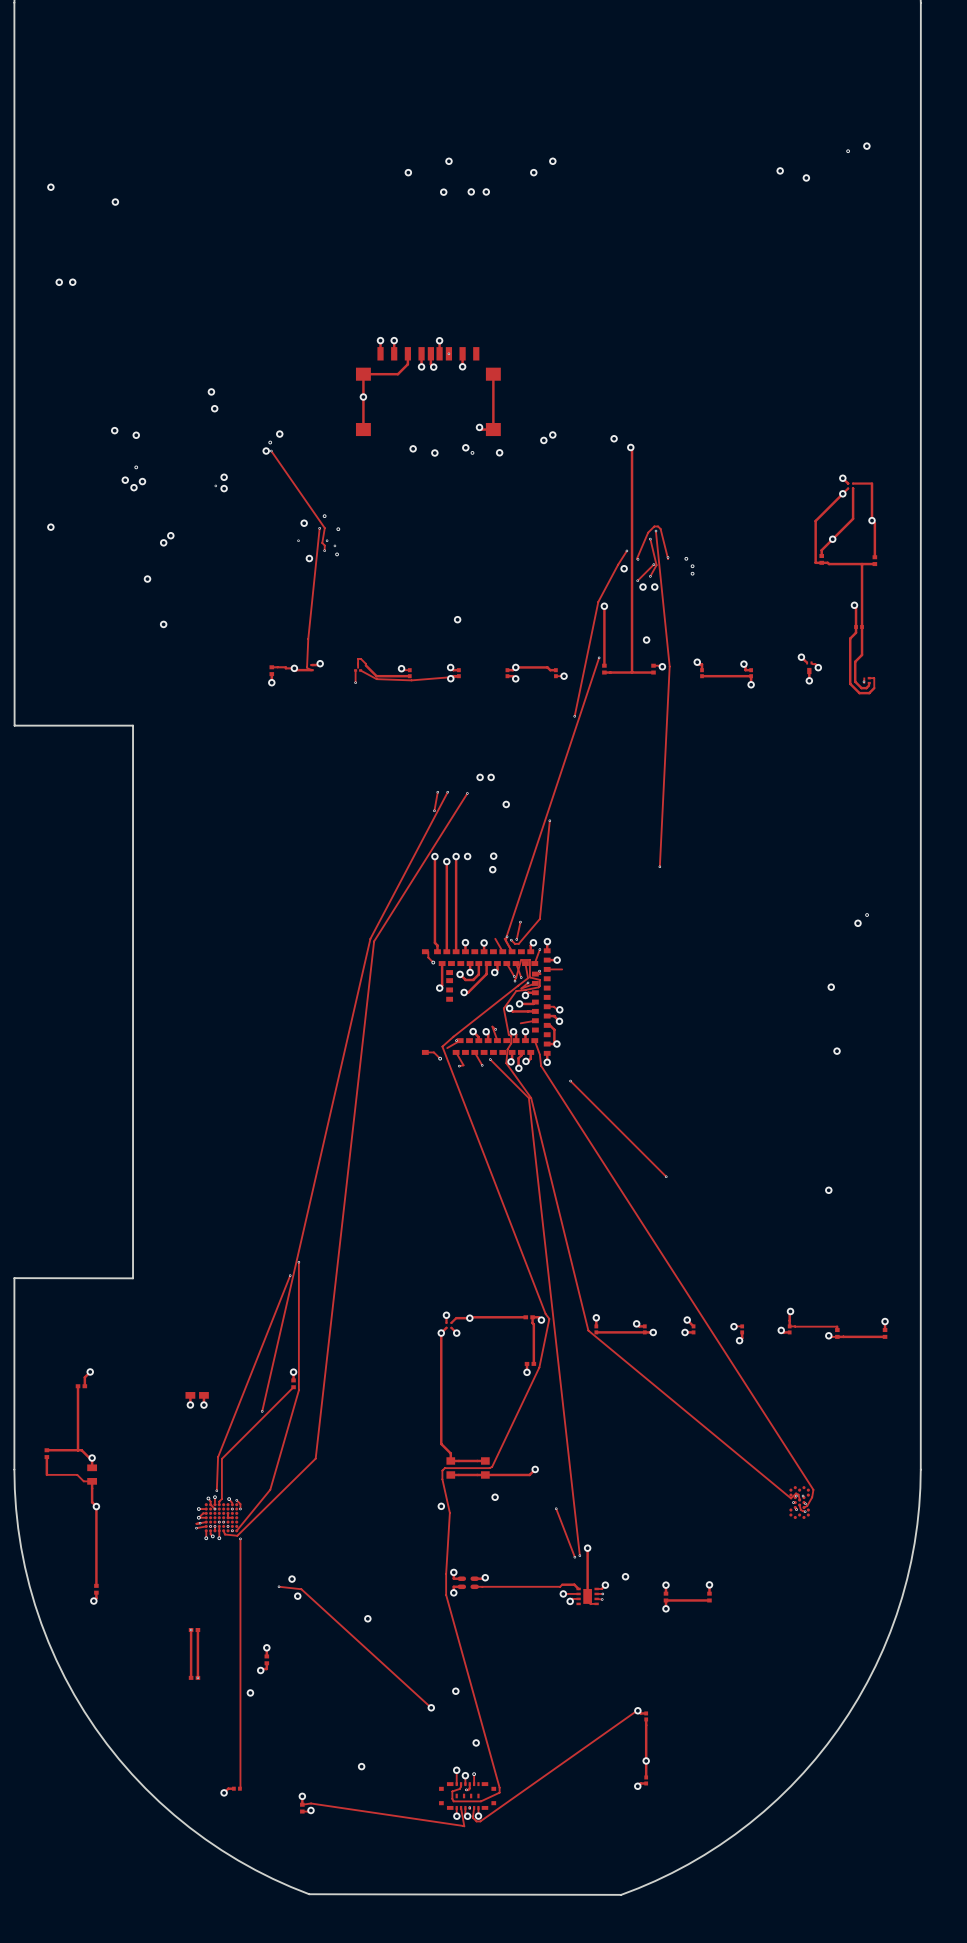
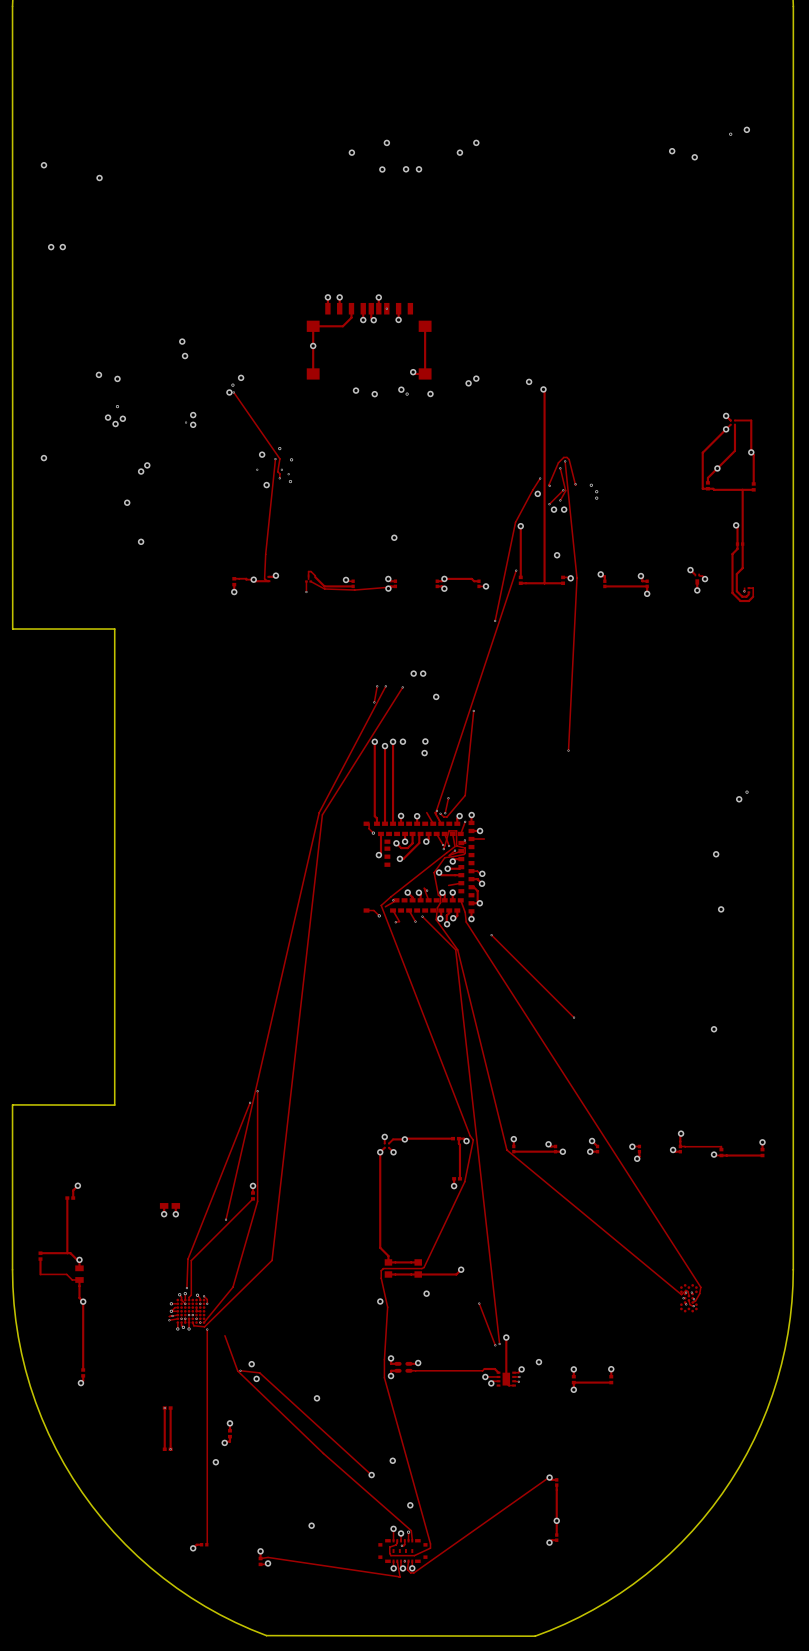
track: none -> (224, 1335) (237, 1371) (323, 1453) (411, 1530) (412, 1540)

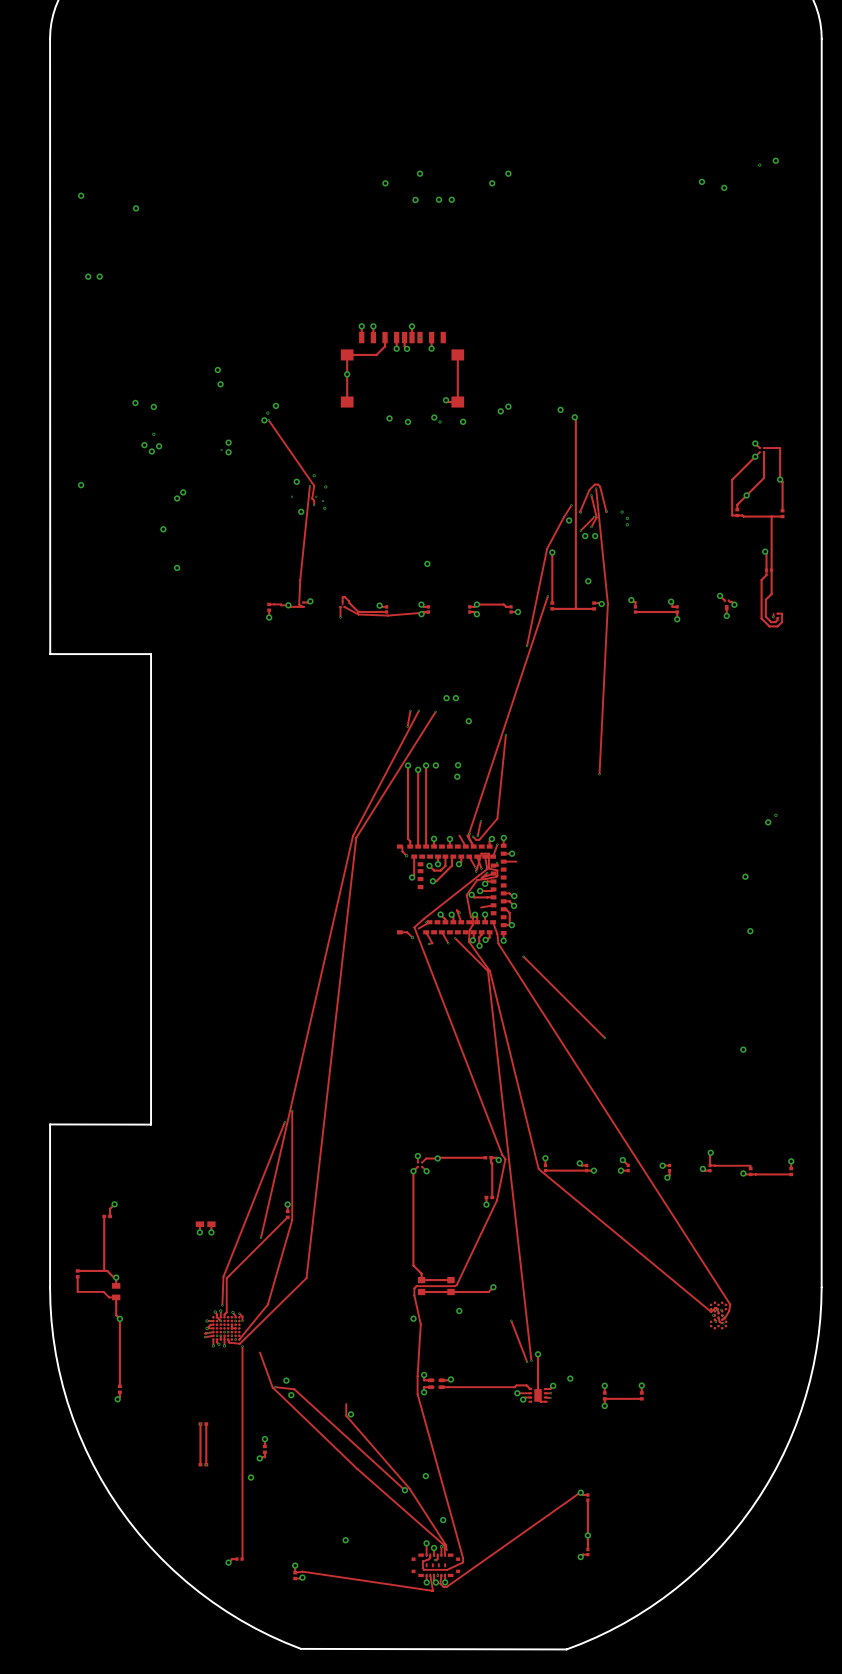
track: none -> (346, 1404) (346, 1415) (409, 1488) (445, 1544) (446, 1550)

